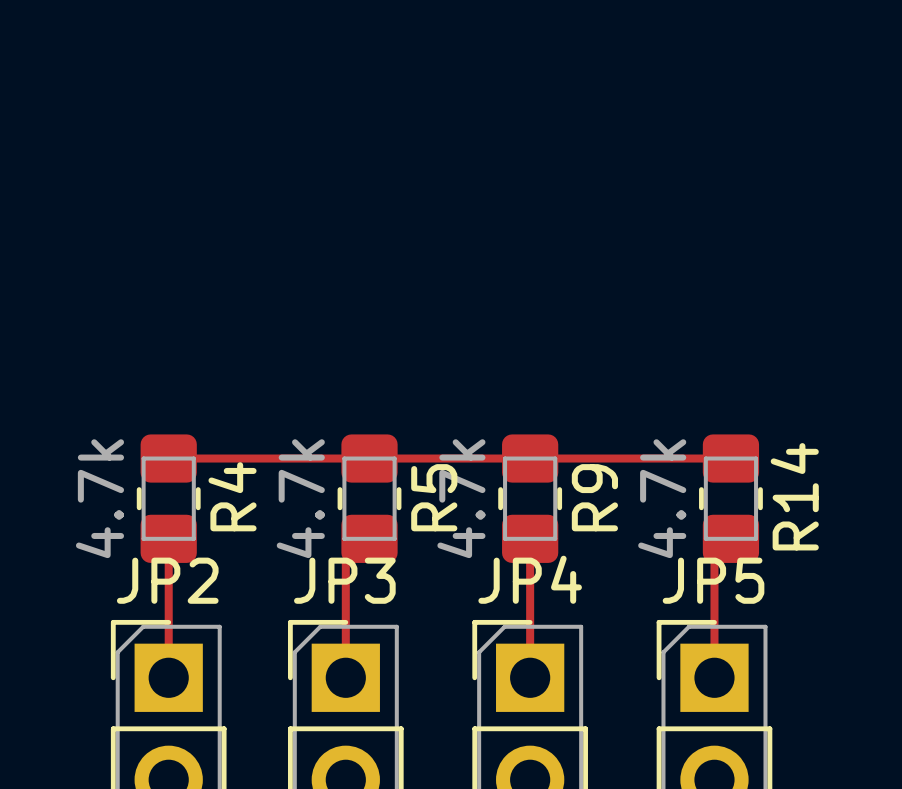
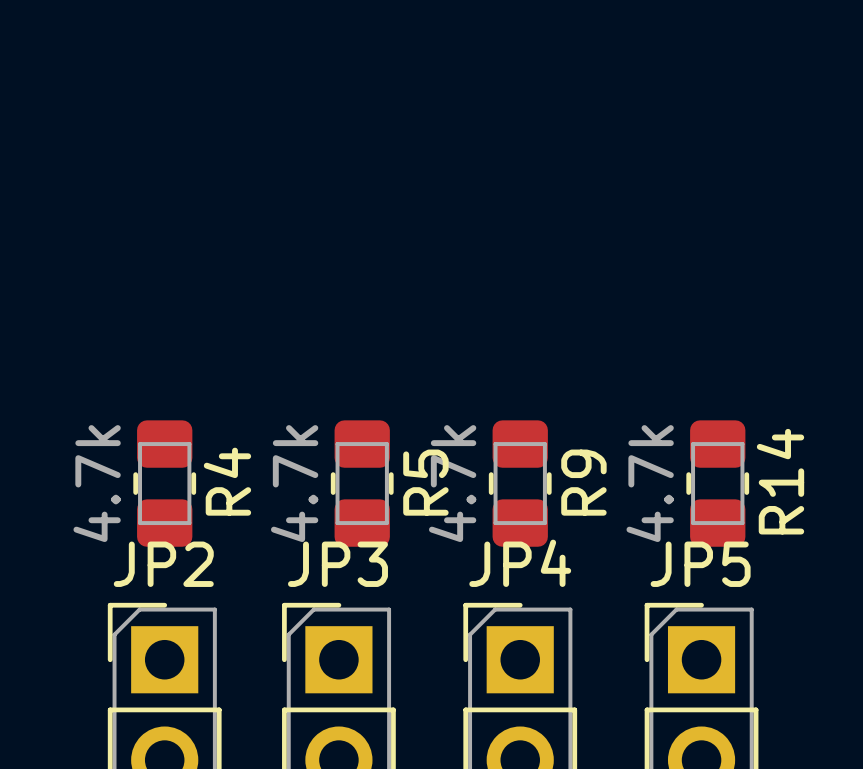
top track: (168, 458) (730, 458) -> none
top track: (168, 538) (168, 677) -> none
top track: (369, 538) (345, 562) (345, 677) -> none
top track: (530, 538) (530, 677) -> none
top track: (730, 538) (714, 555) (714, 677) -> none

